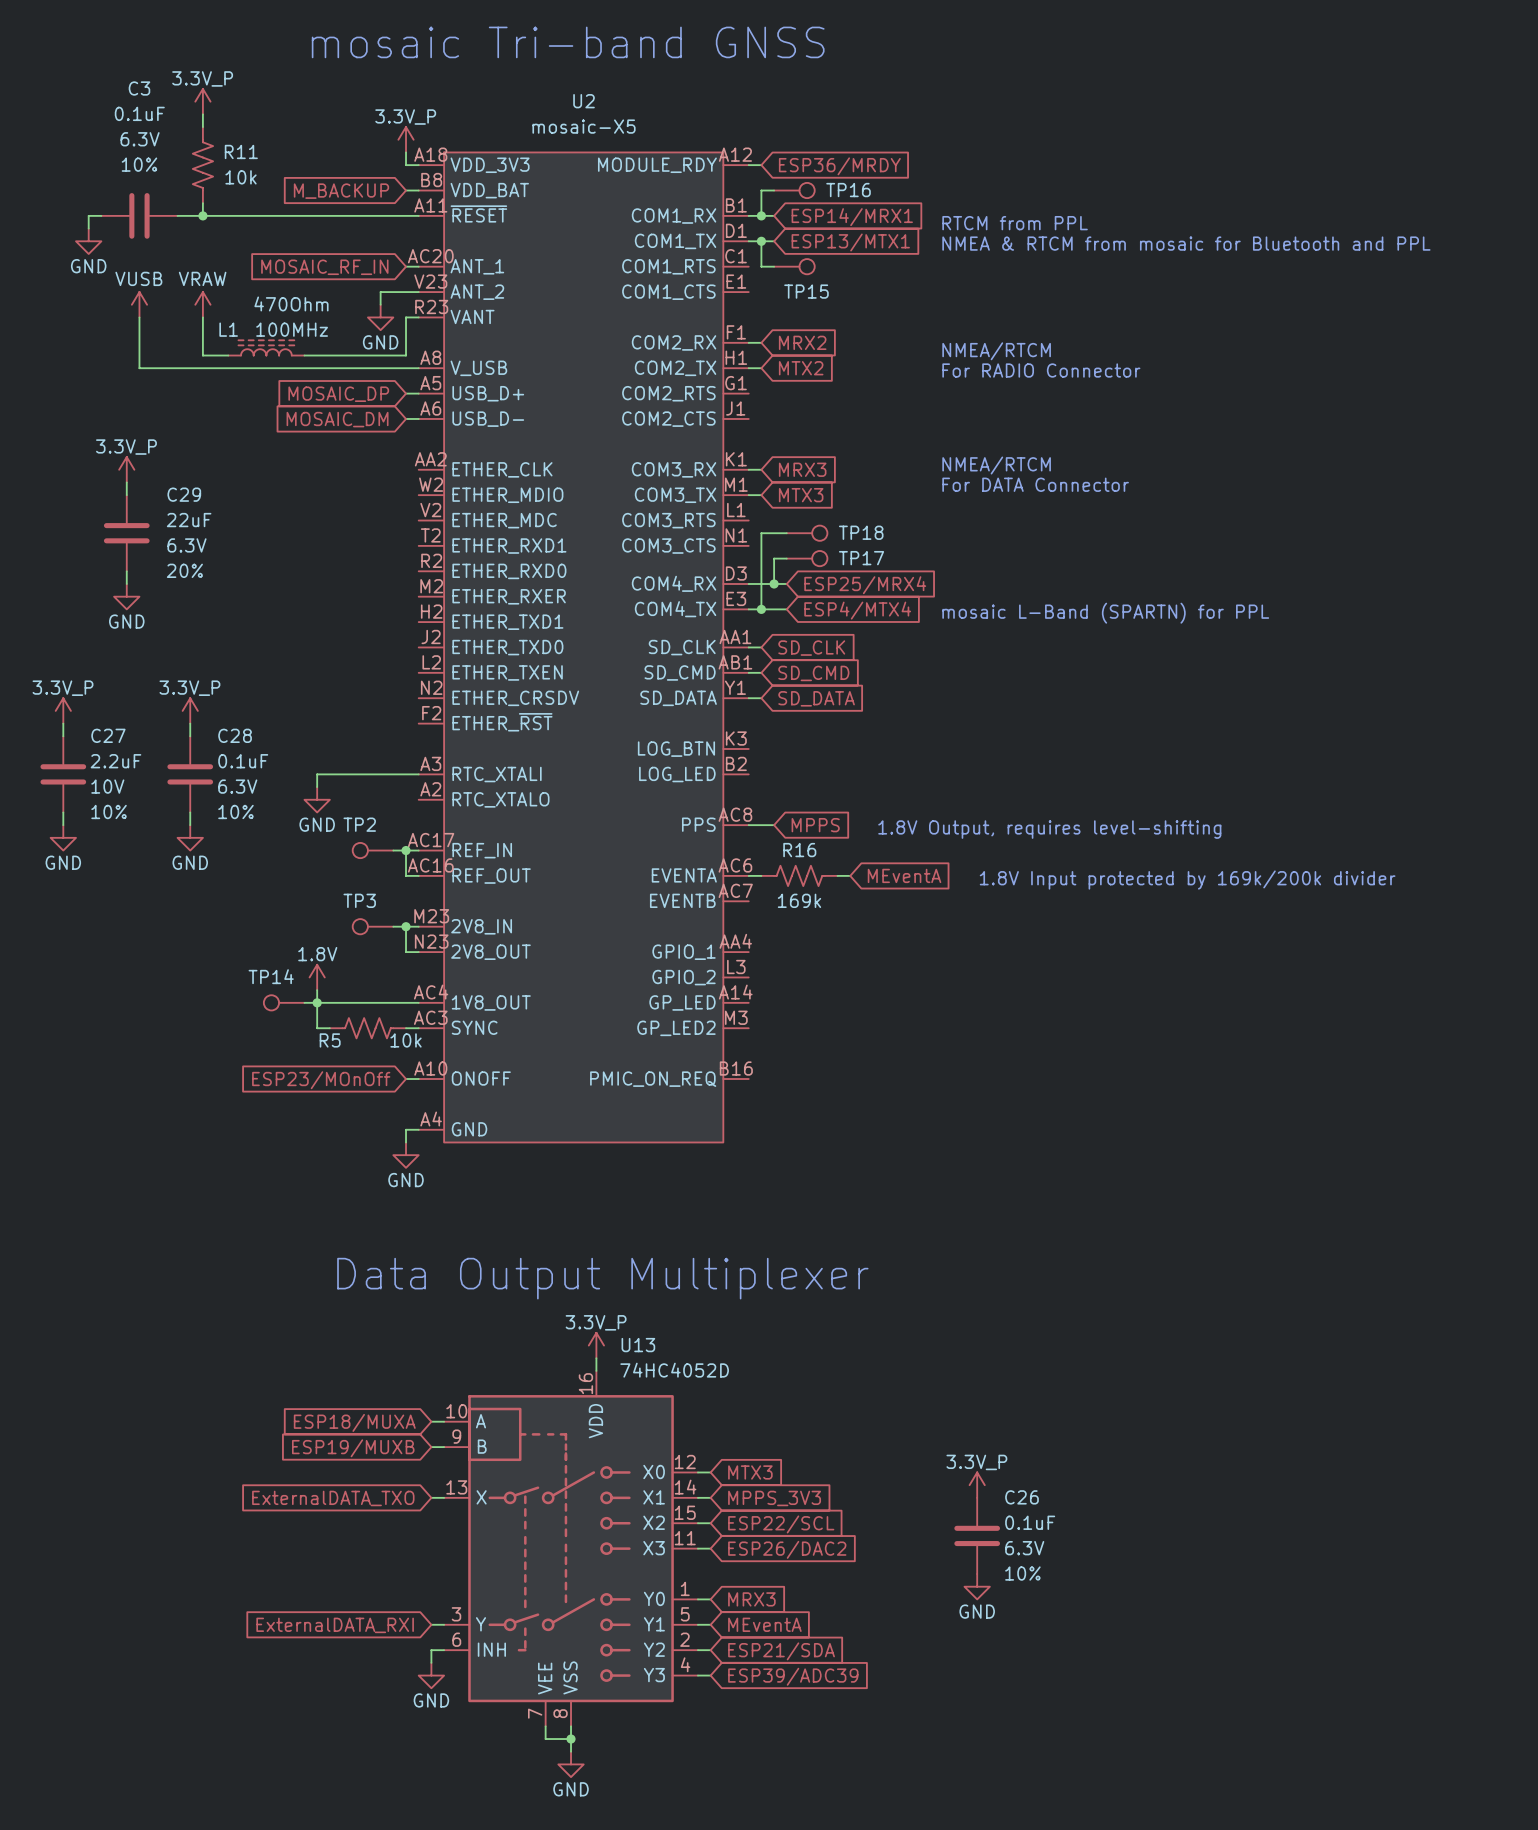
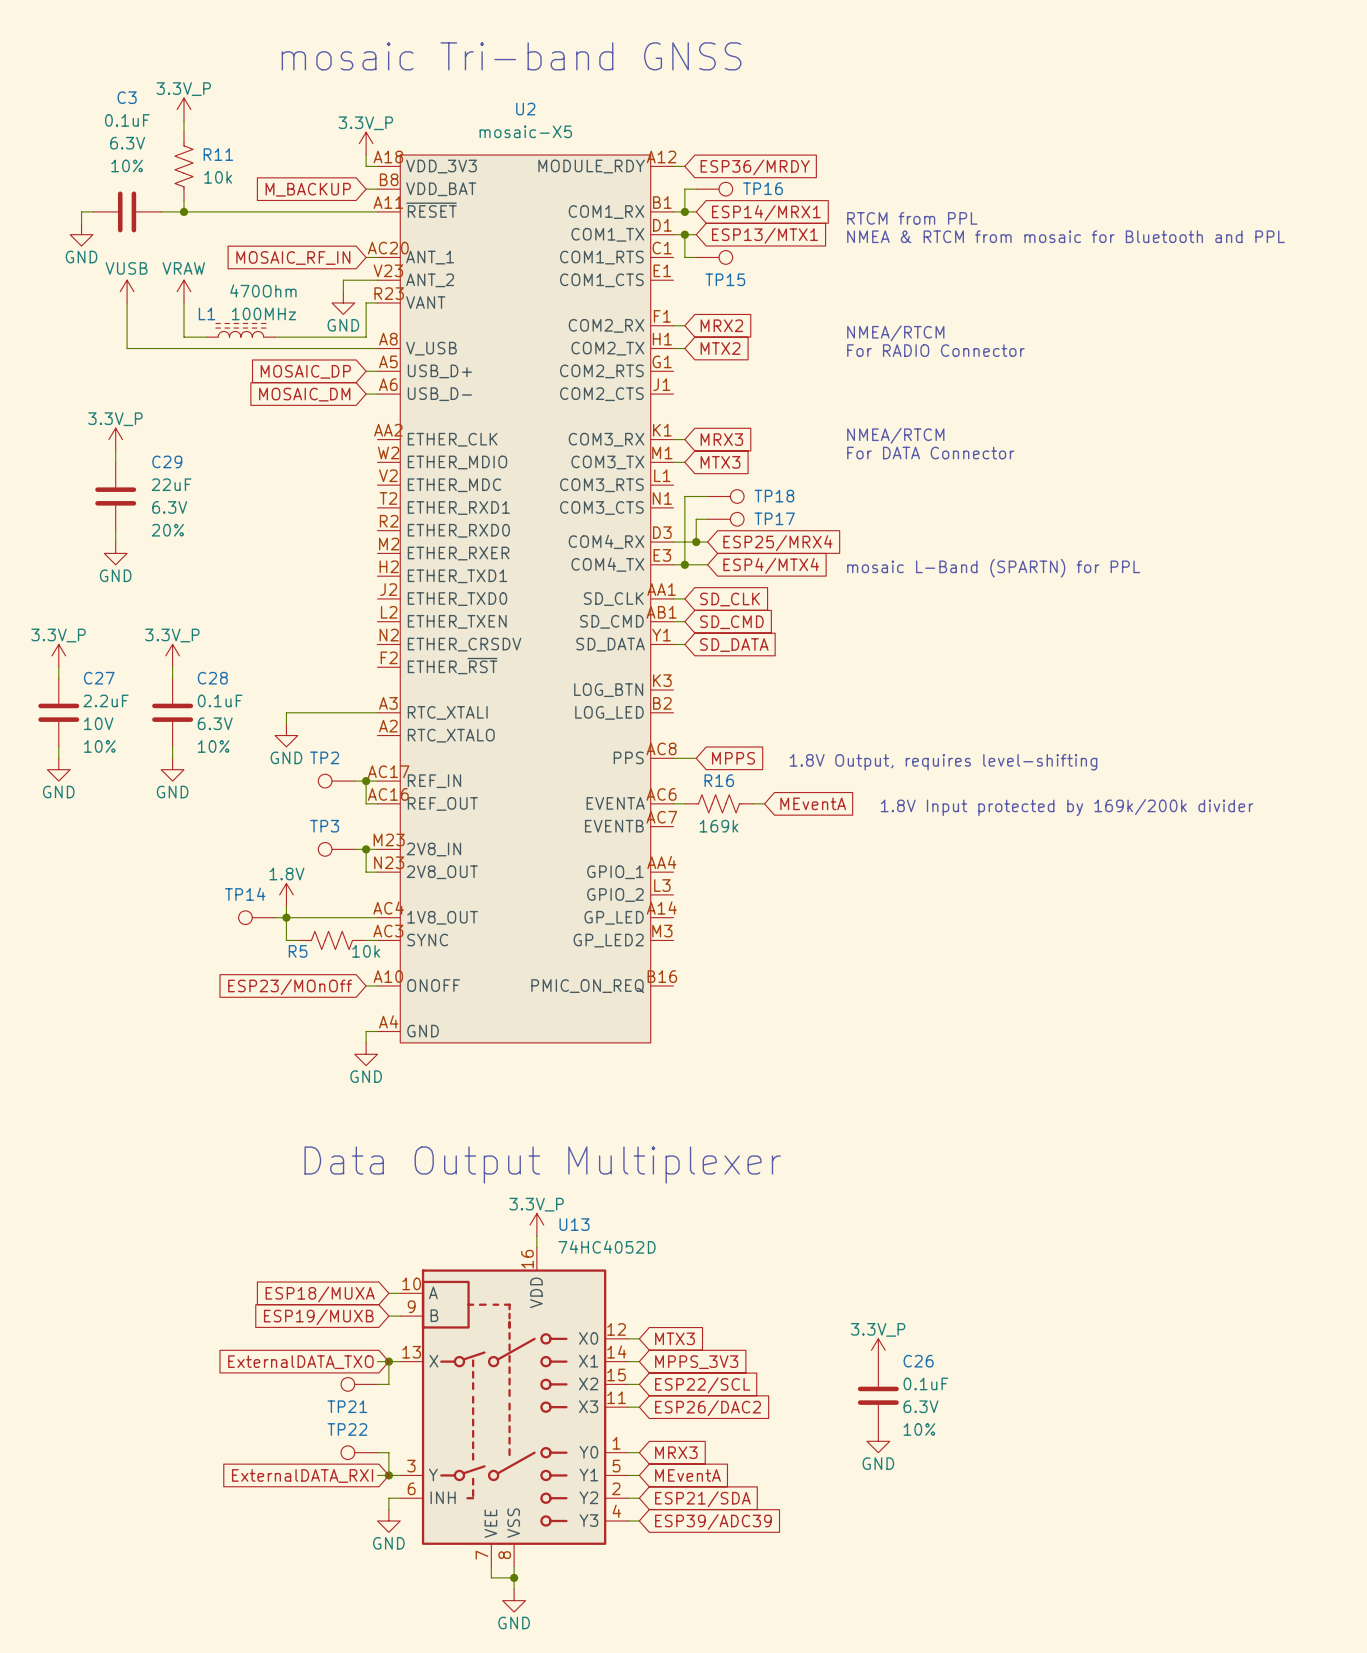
wire: none -> (377, 1361) (388, 1361) (388, 1384) (377, 1384)
junction: none -> (388, 1361)
TP21: none -> (359, 1384)
TP22: none -> (359, 1452)
wire: none -> (377, 1452) (388, 1452) (388, 1475) (377, 1475)
junction: none -> (388, 1475)

